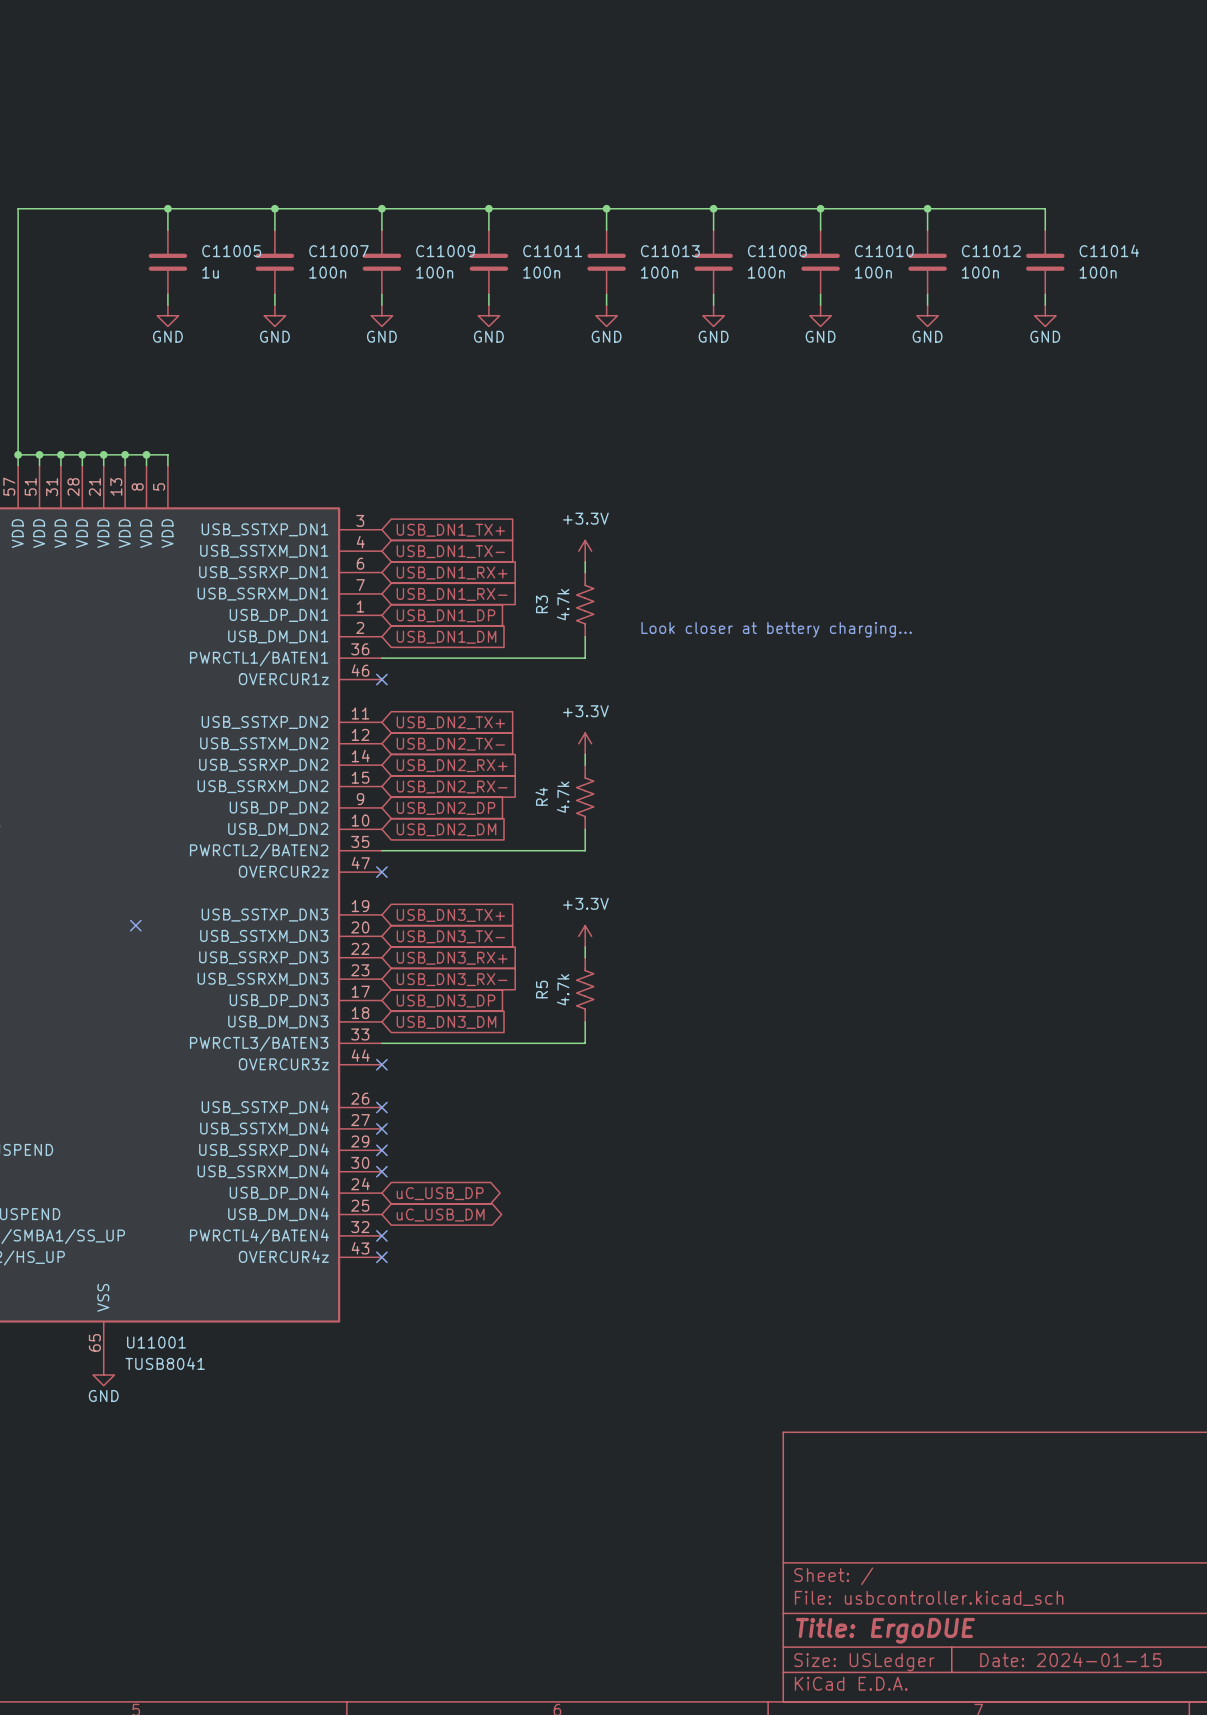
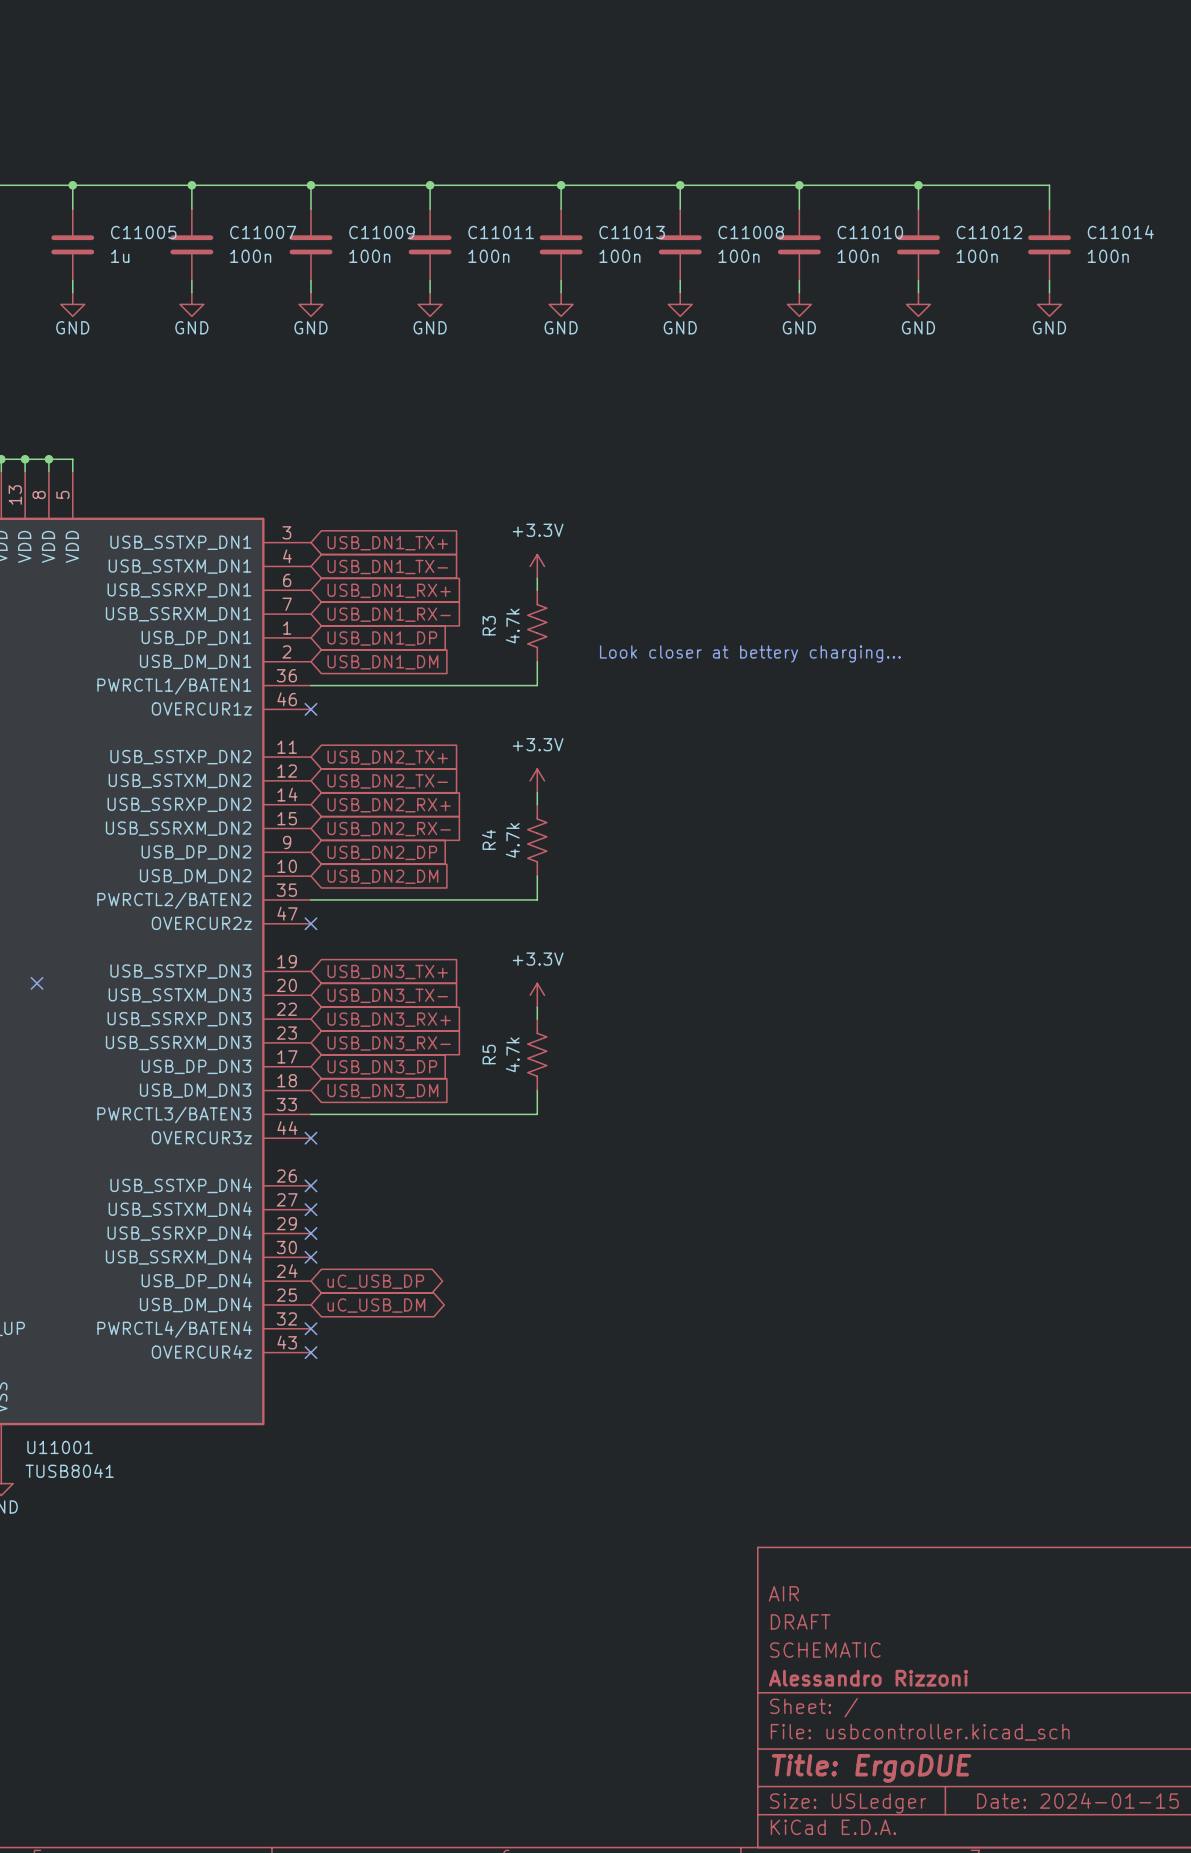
title block: none -> AIR (783, 1593)
title block: none -> DRAFT (800, 1621)
title block: none -> SCHEMATIC (825, 1650)
title block: none -> Alessandro Rizzoni (868, 1678)

